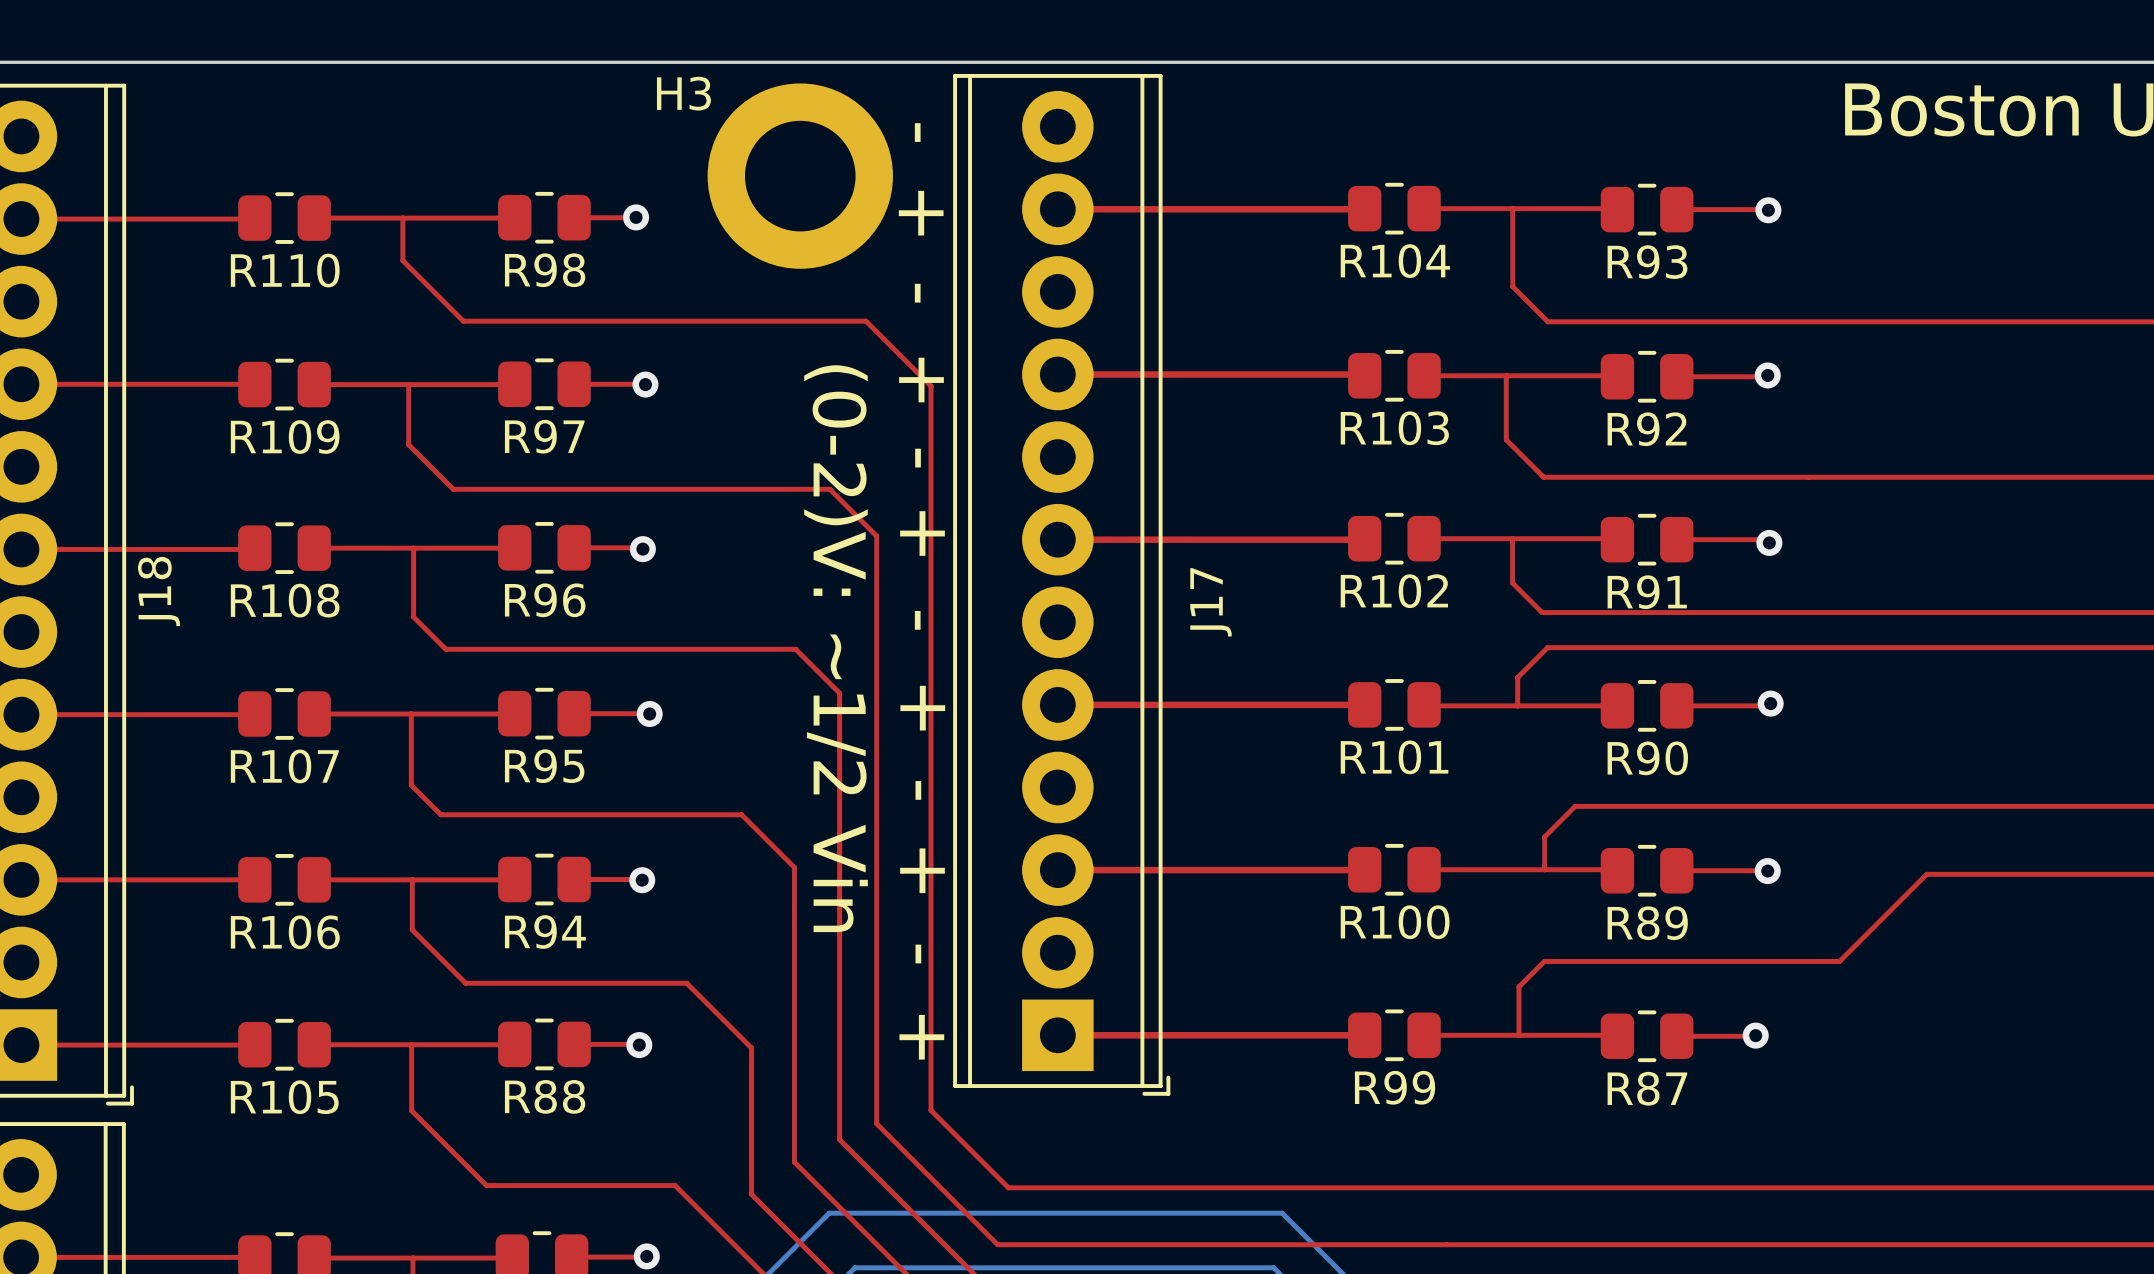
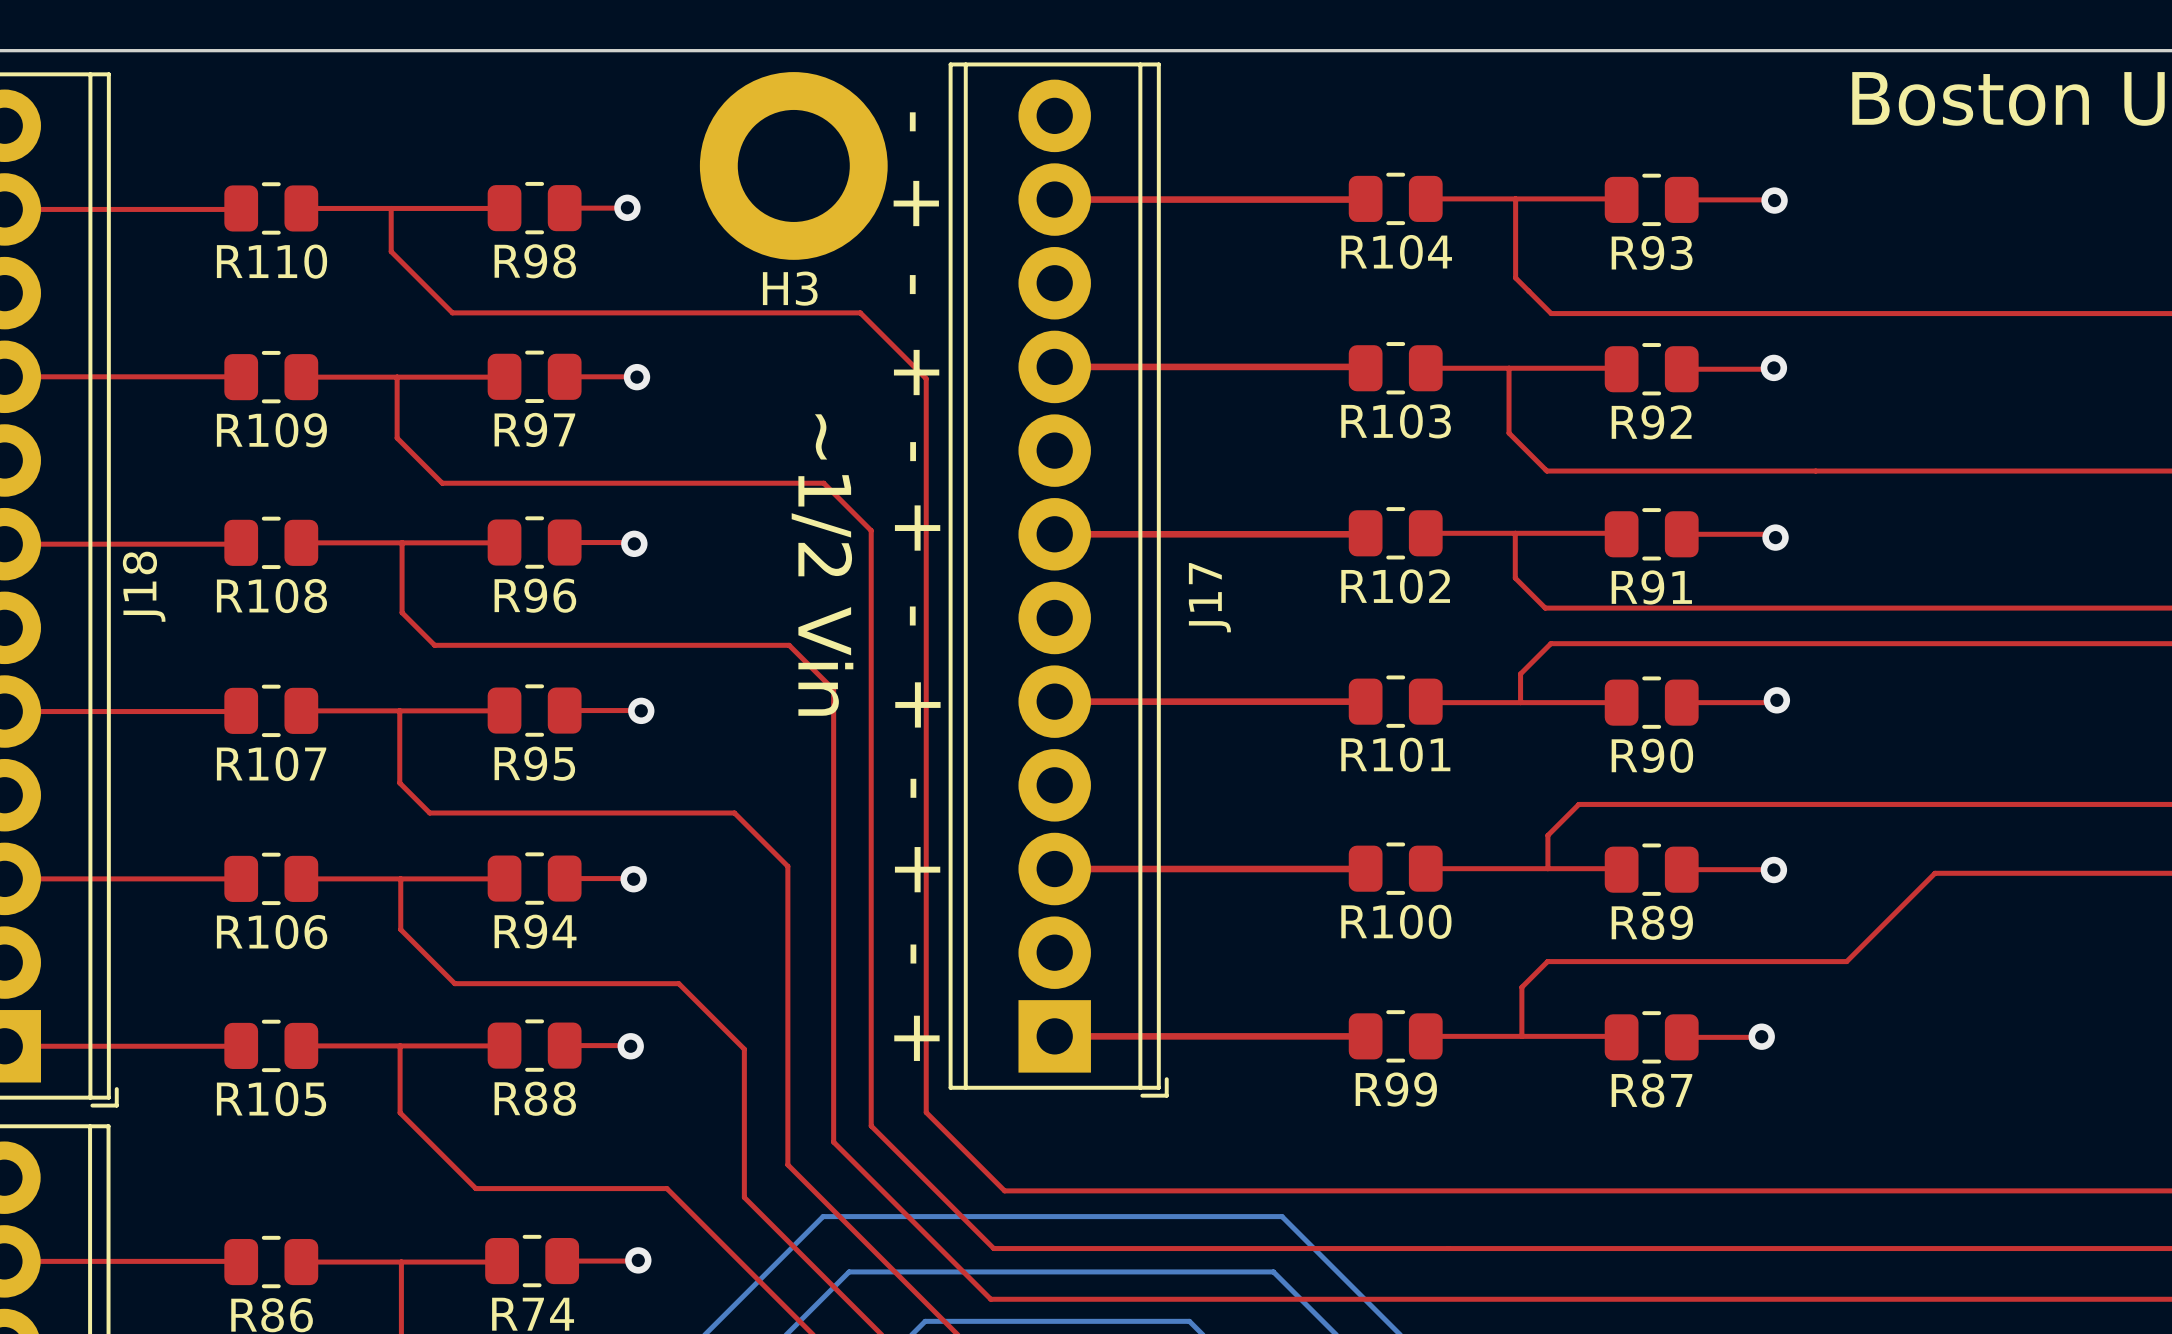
H3 name position: H3 (683, 93) -> H3 (790, 288)
text: (0-2)V: ~1/2 Vin (836, 648) -> ~1/2 Vin (822, 565)

